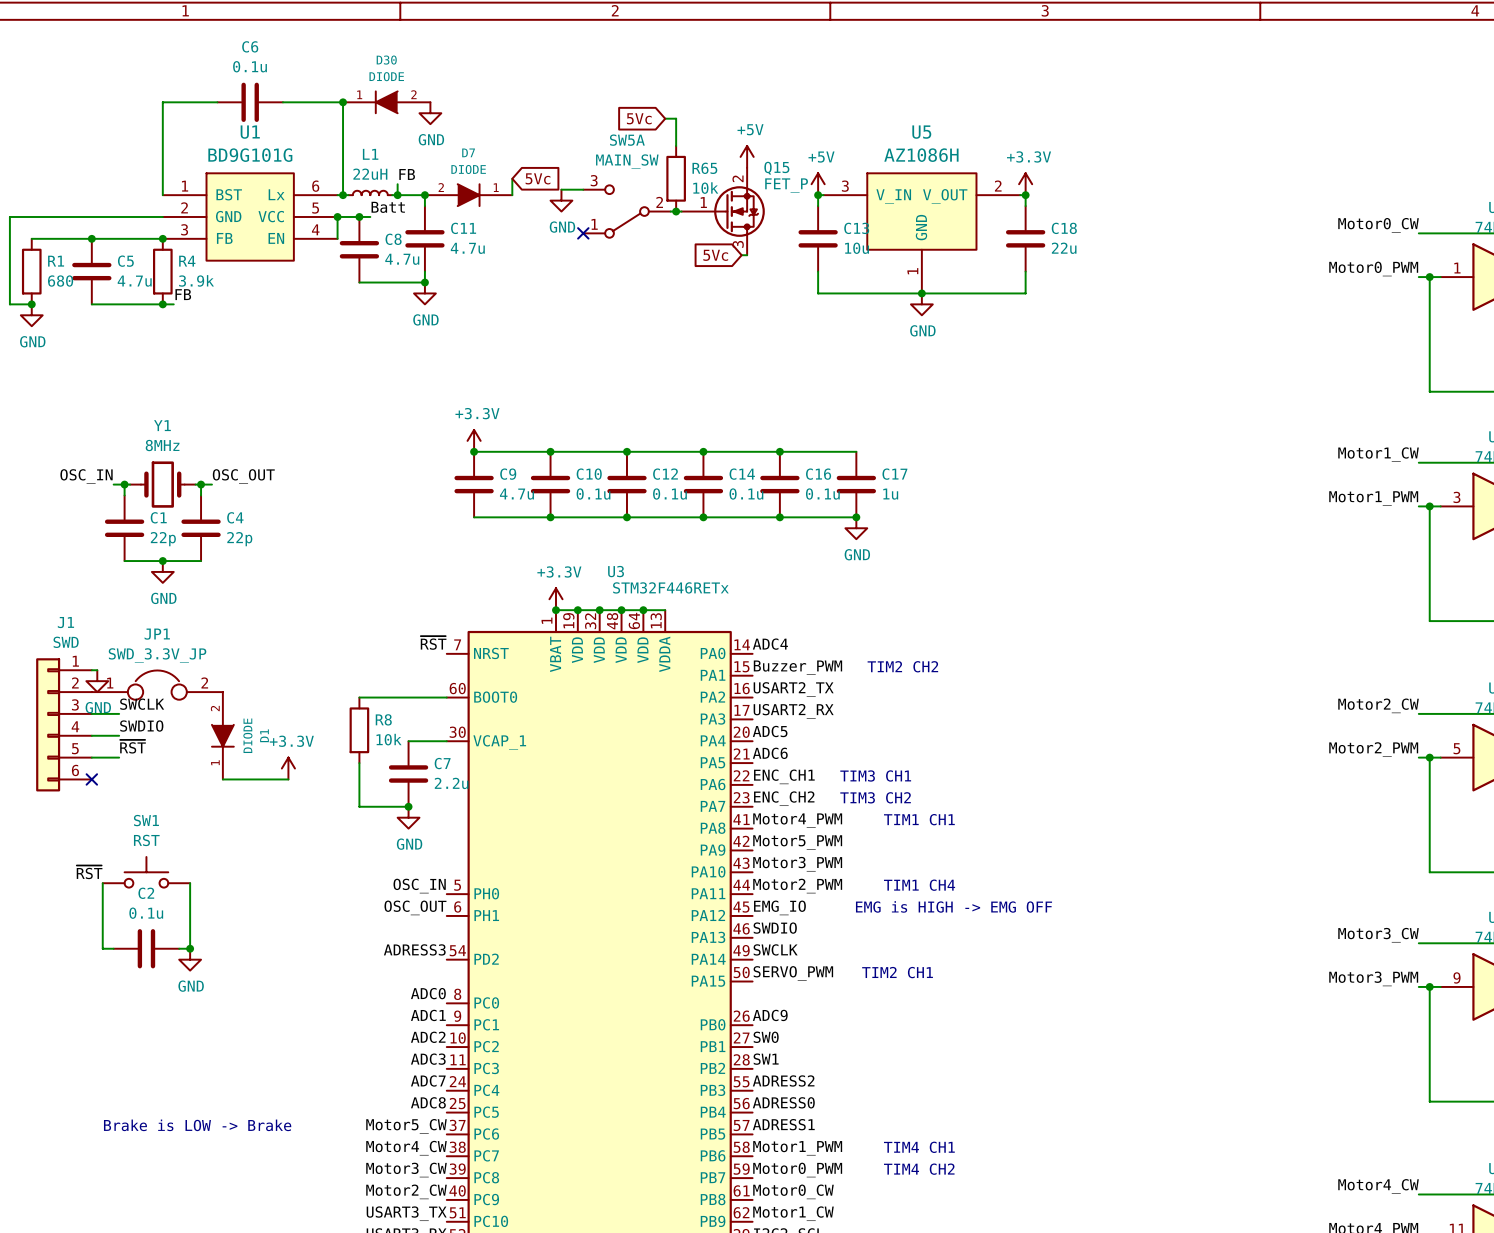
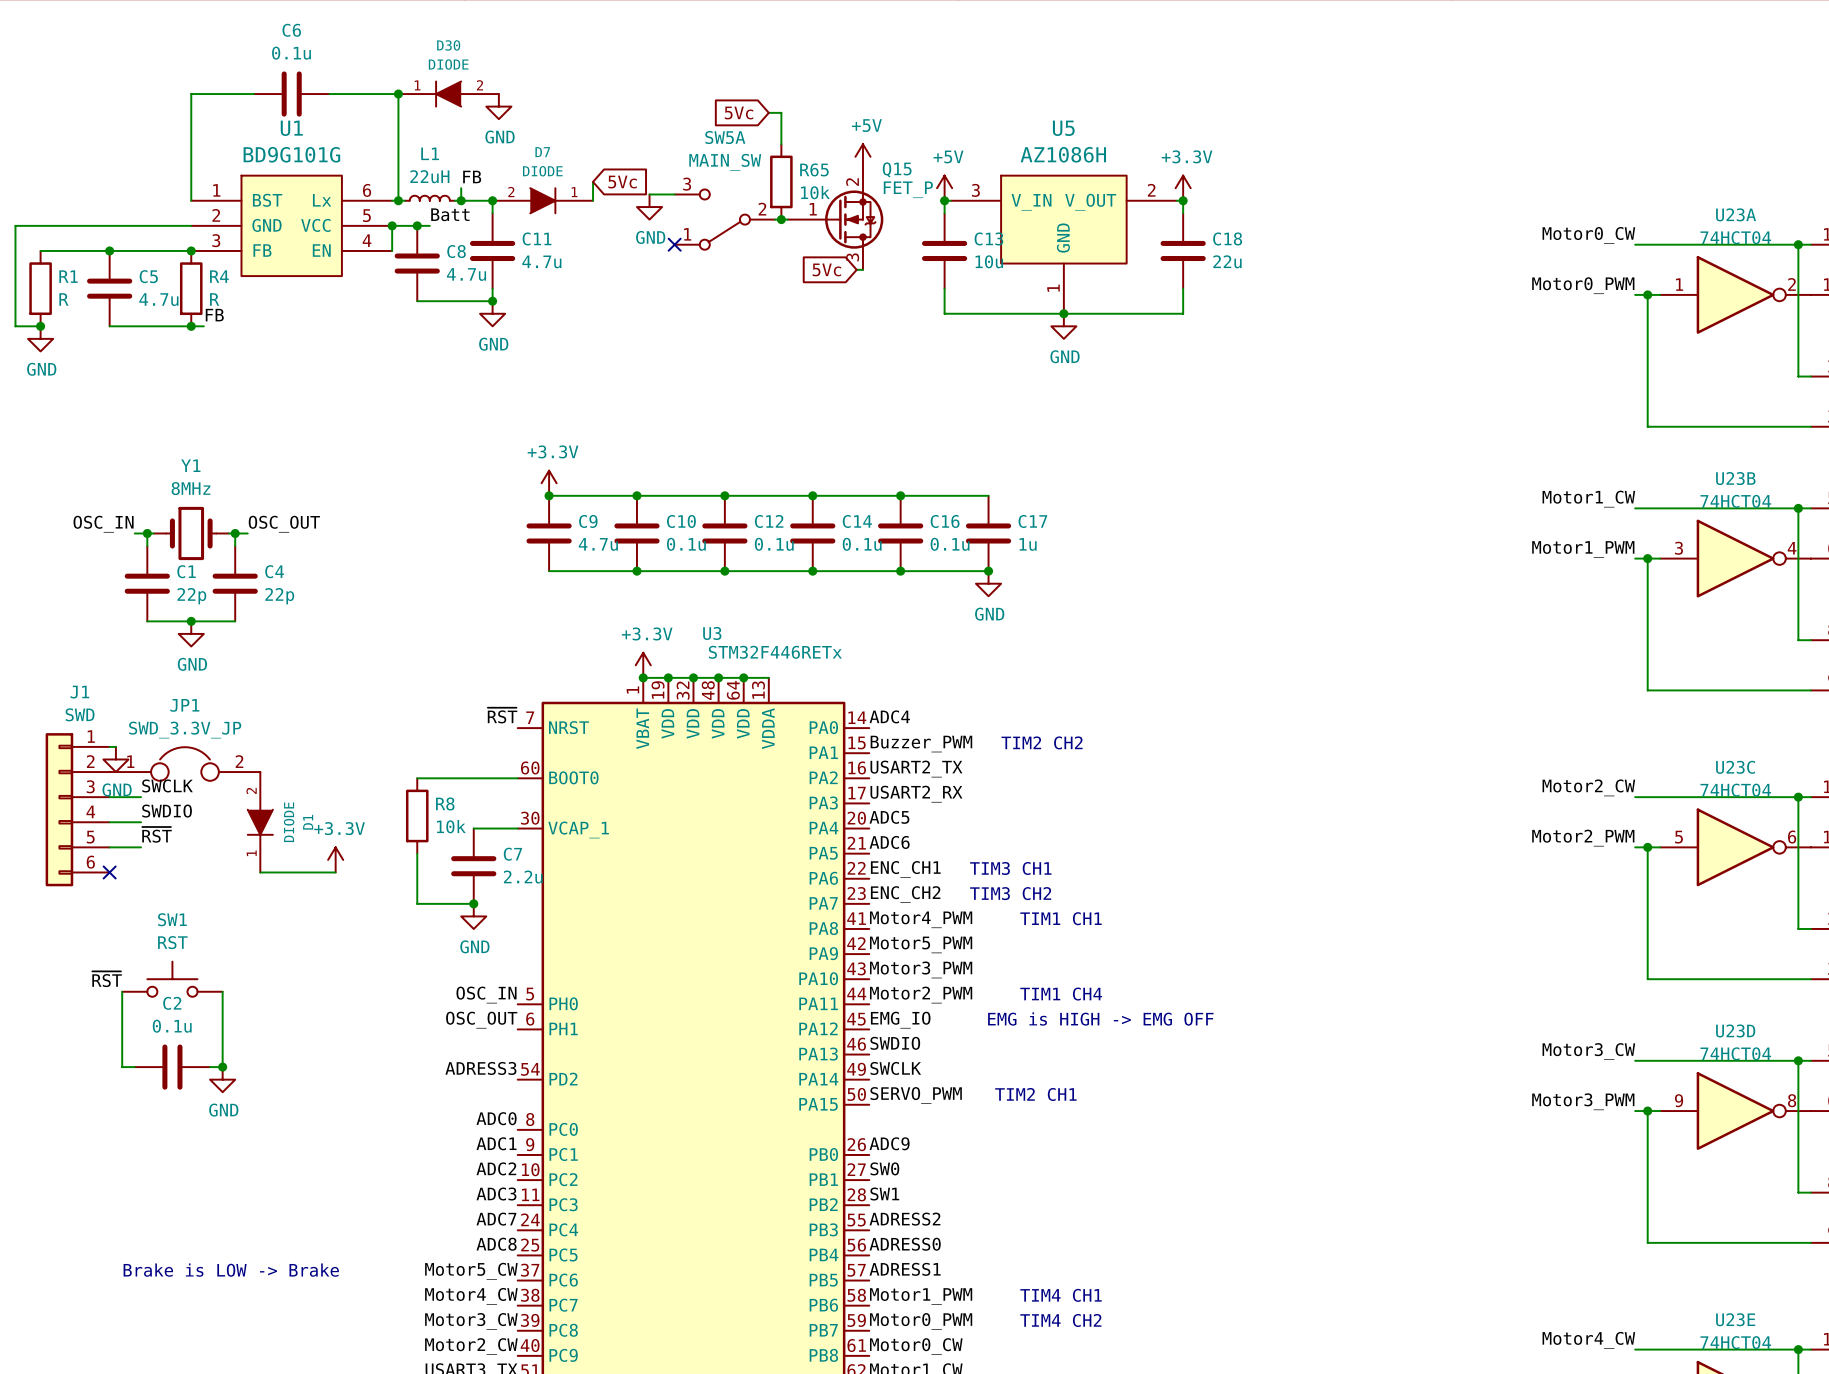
R4 value: 3.9k (196, 280) -> R (214, 299)
R1 value: 680 (60, 281) -> R (63, 299)

